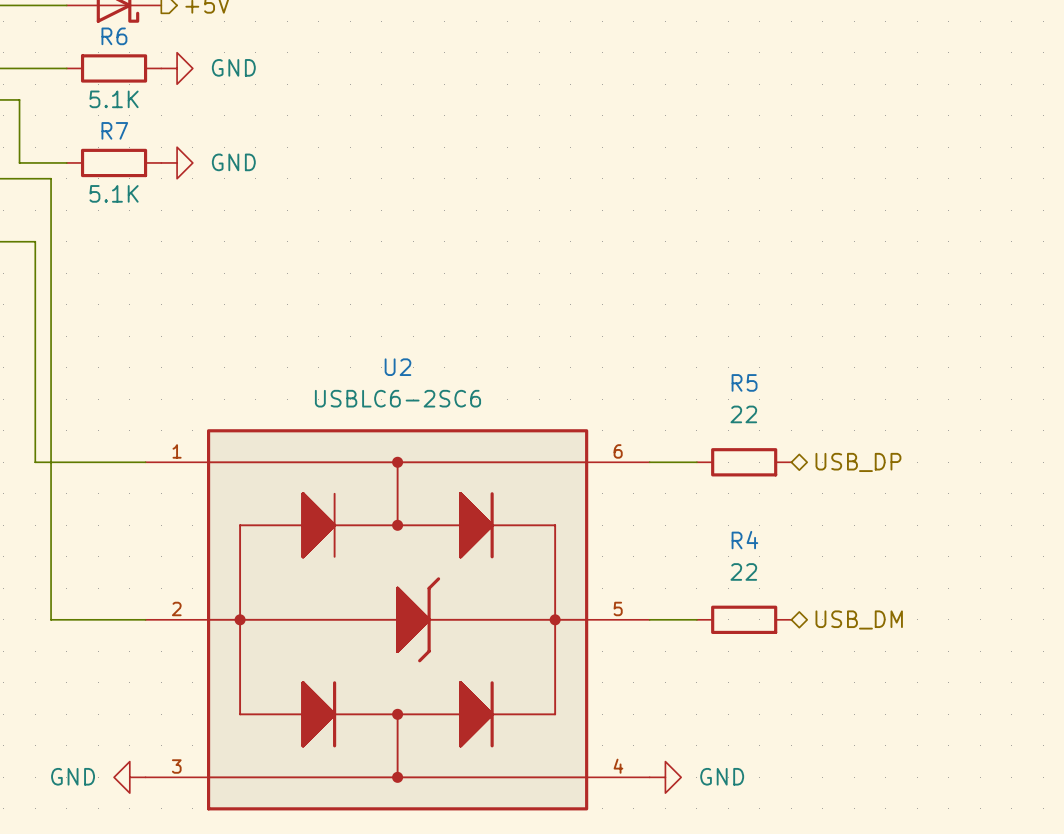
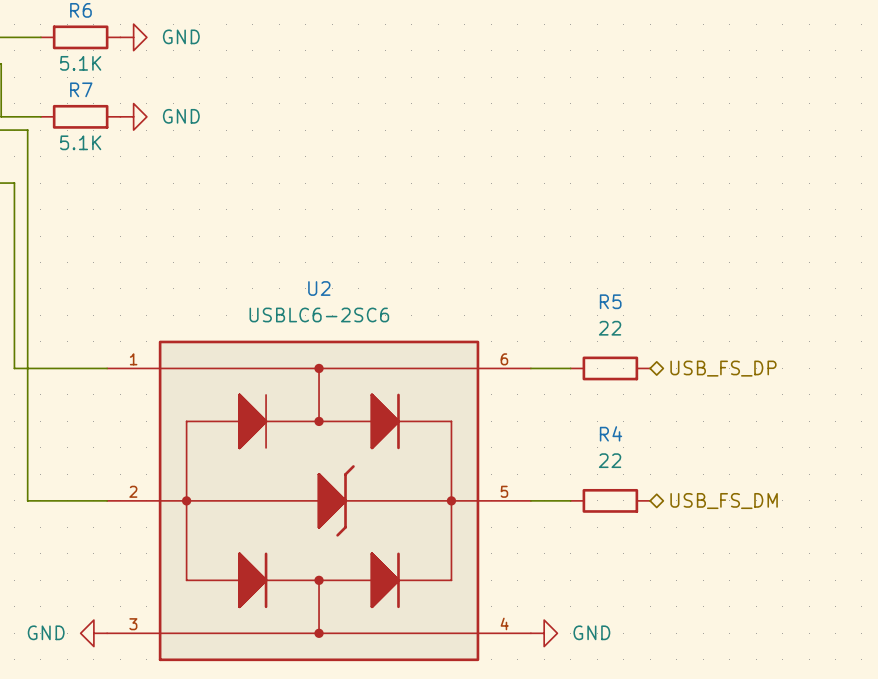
hierarchical label: USB_DP (858, 462) -> USB_FS_DP (723, 368)
hierarchical label: USB_DM (859, 619) -> USB_FS_DM (724, 501)

